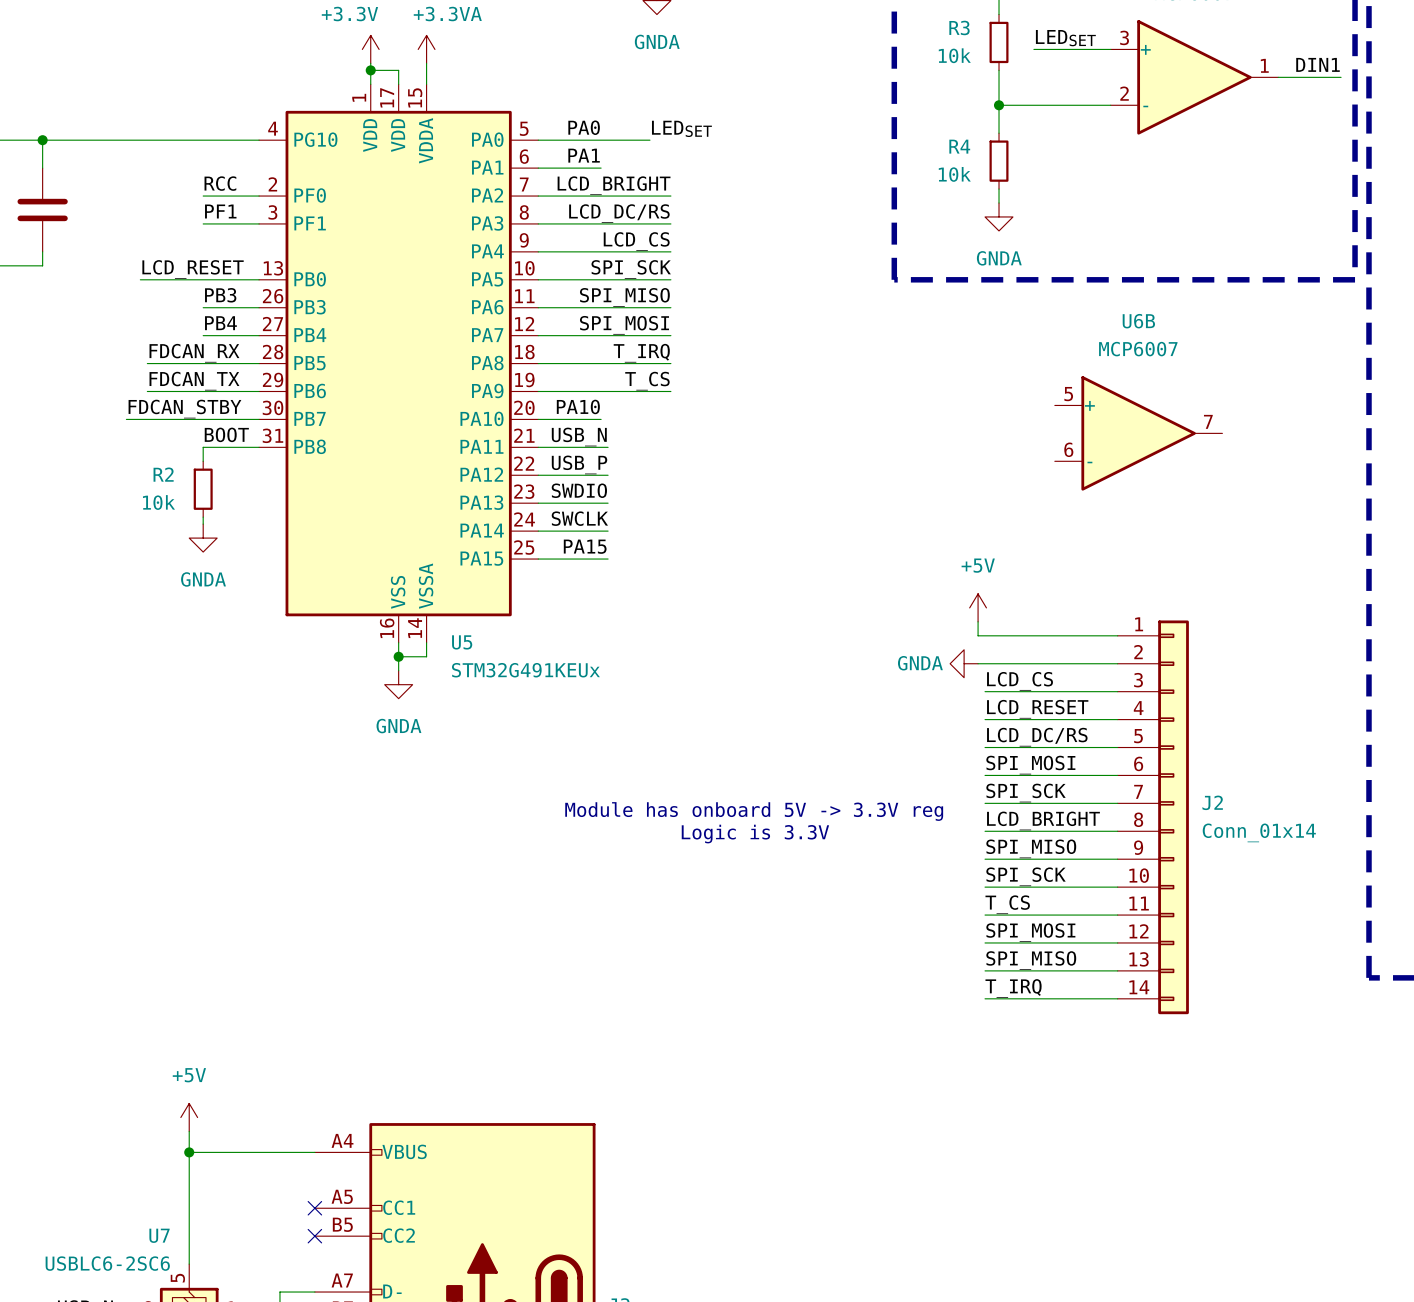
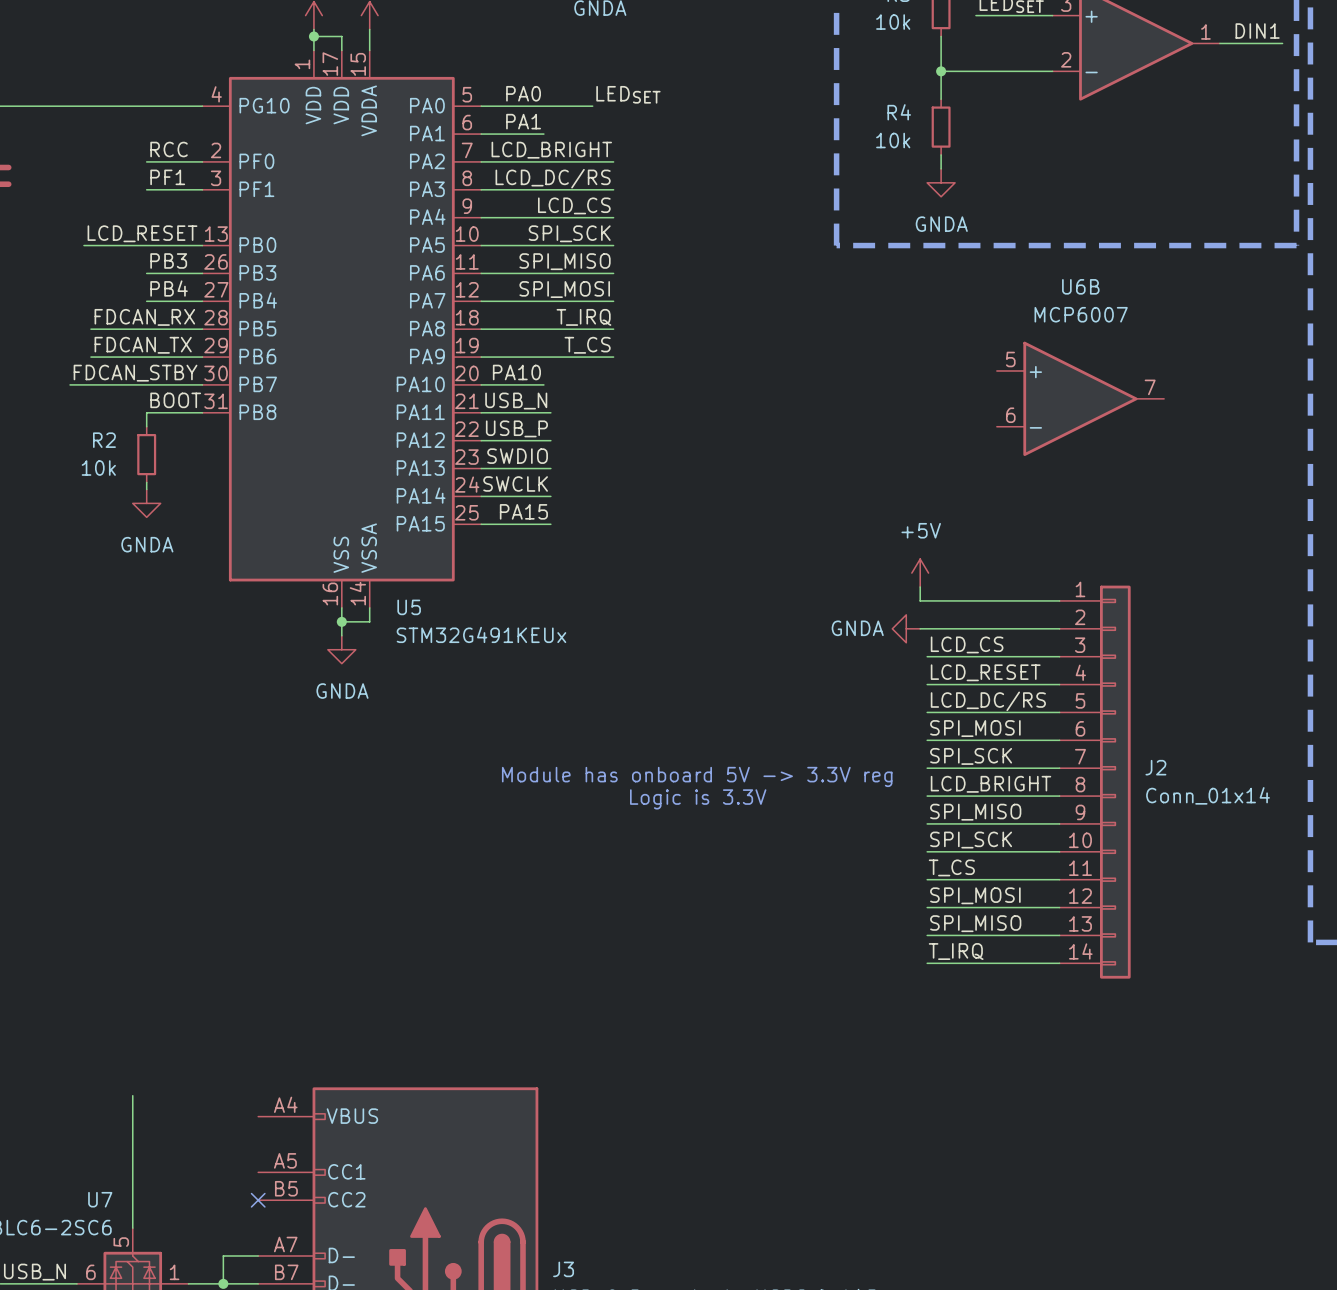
power symbol: +5V (189, 1117) -> none
wire: (189, 1152) (314, 1152) -> none
junction: (189, 1152) -> none
no-connect mark: (314, 1208) -> none

